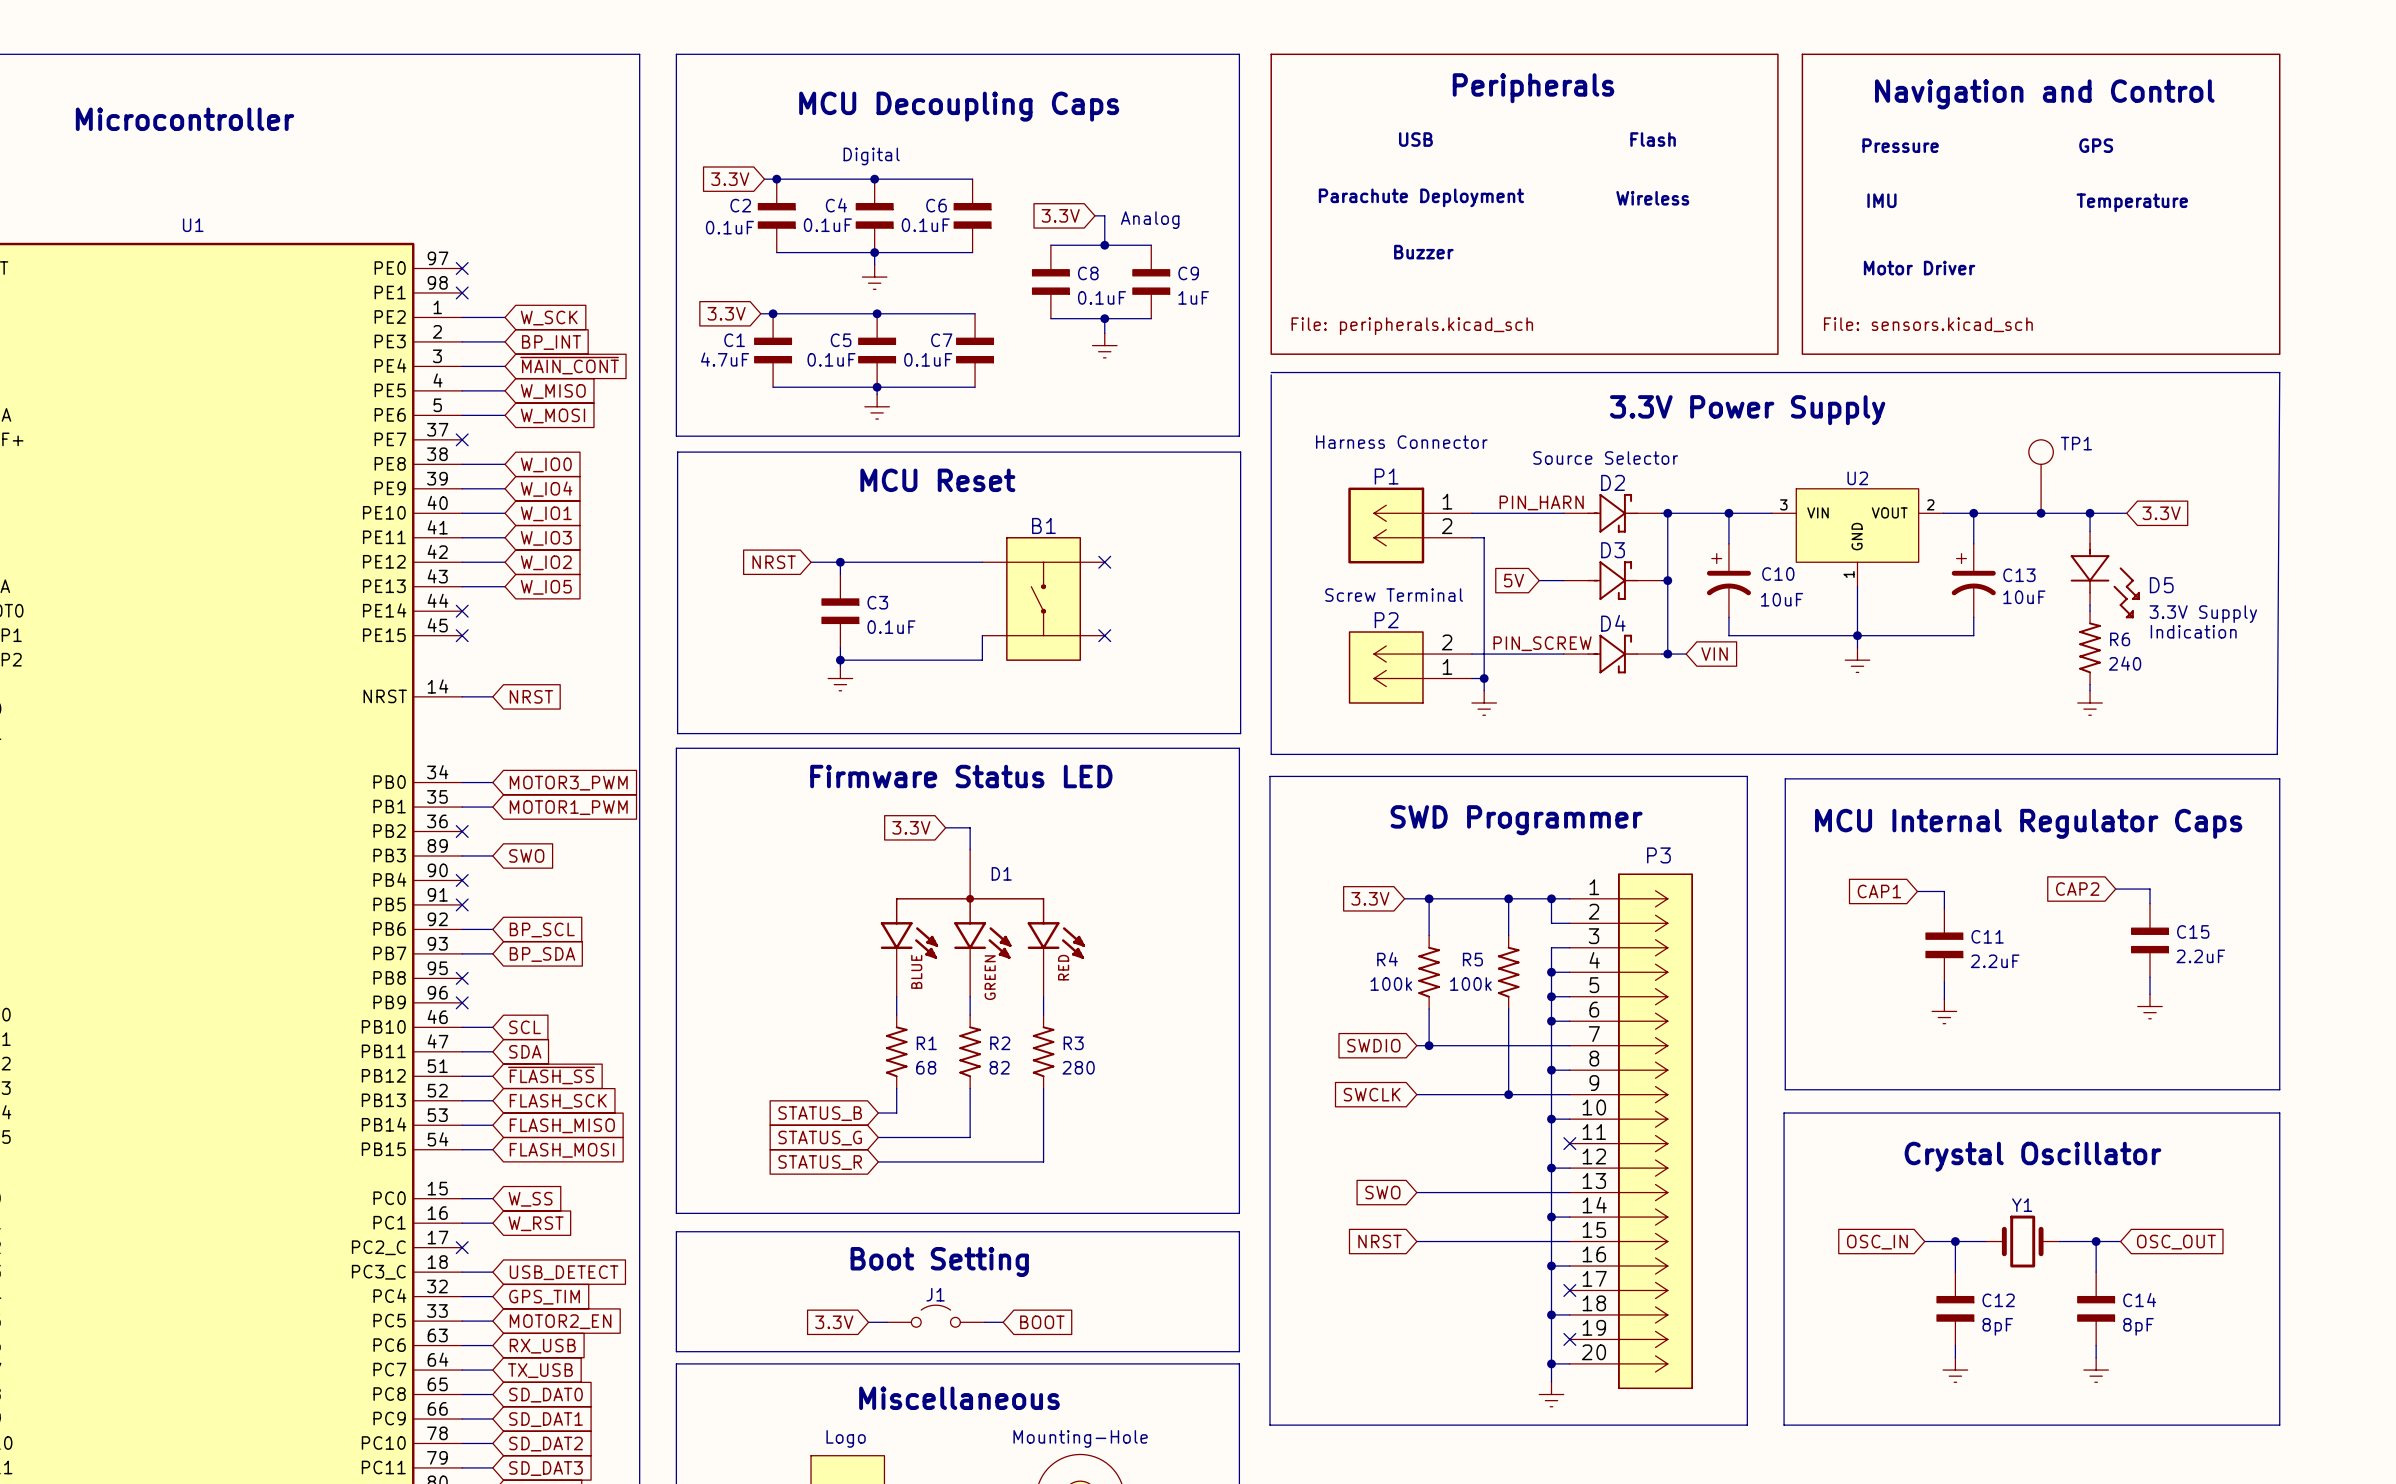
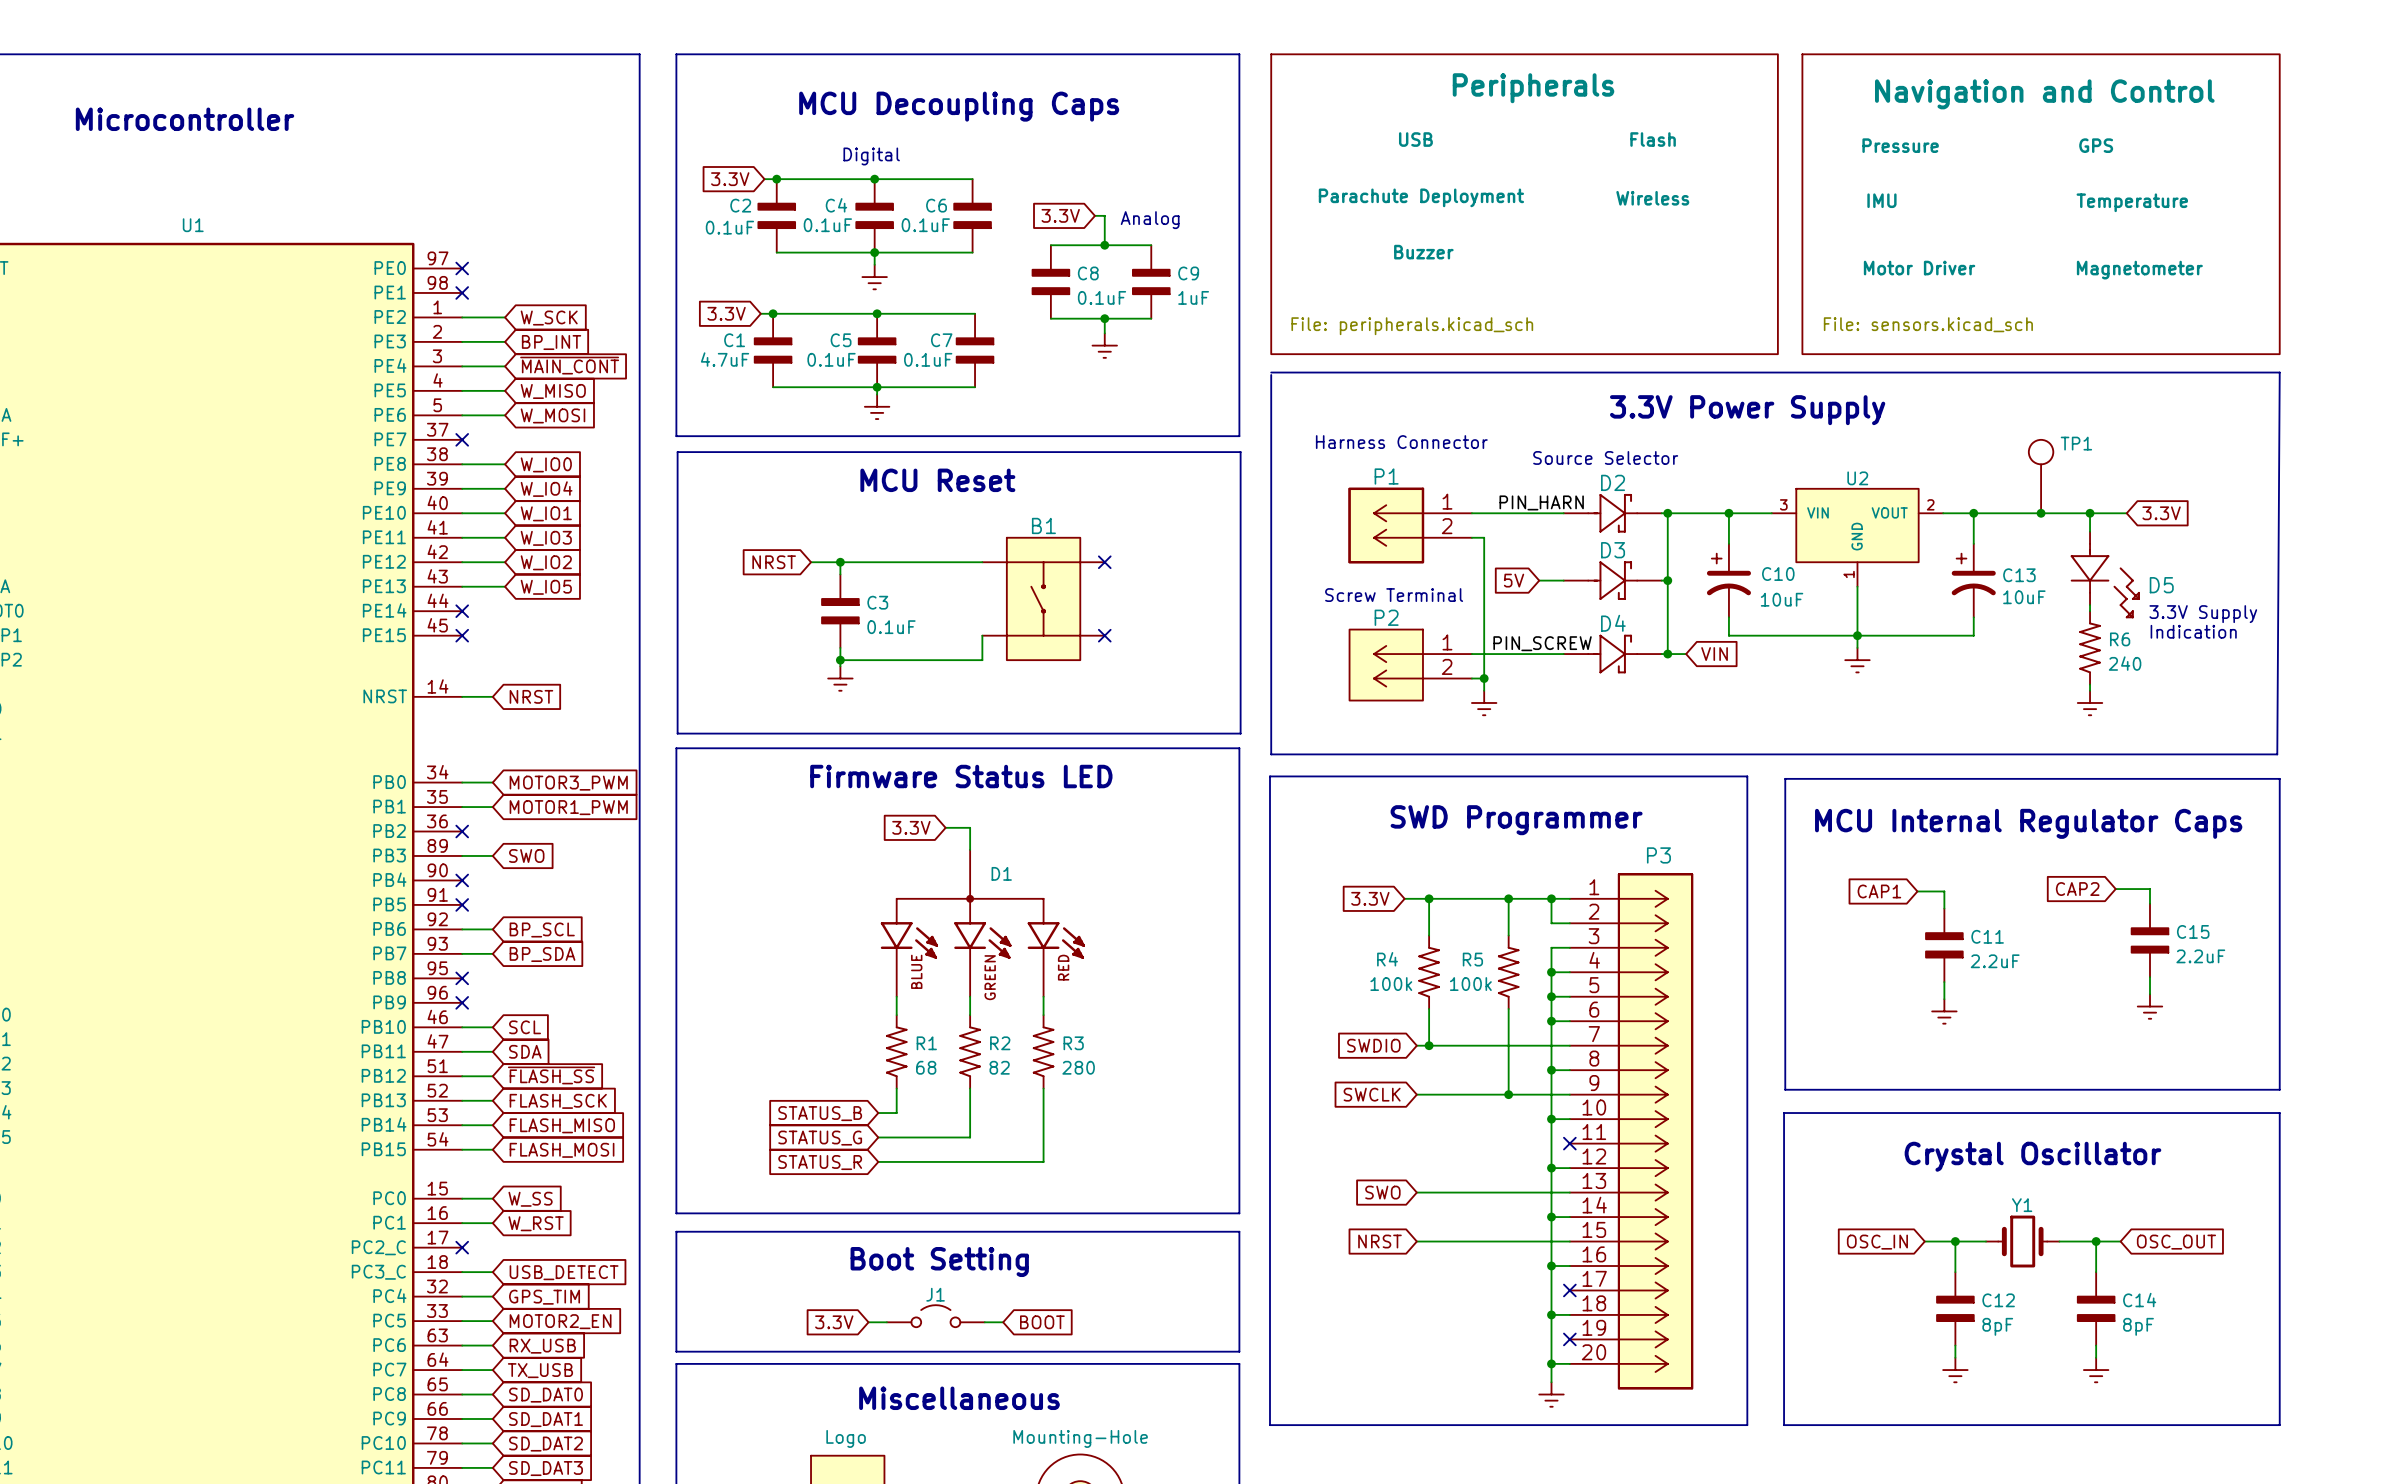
sheet Navigation and Control text: none -> Magnetometer (2139, 270)
P2 flip: as is (1386, 667) -> up-down (1386, 665)

